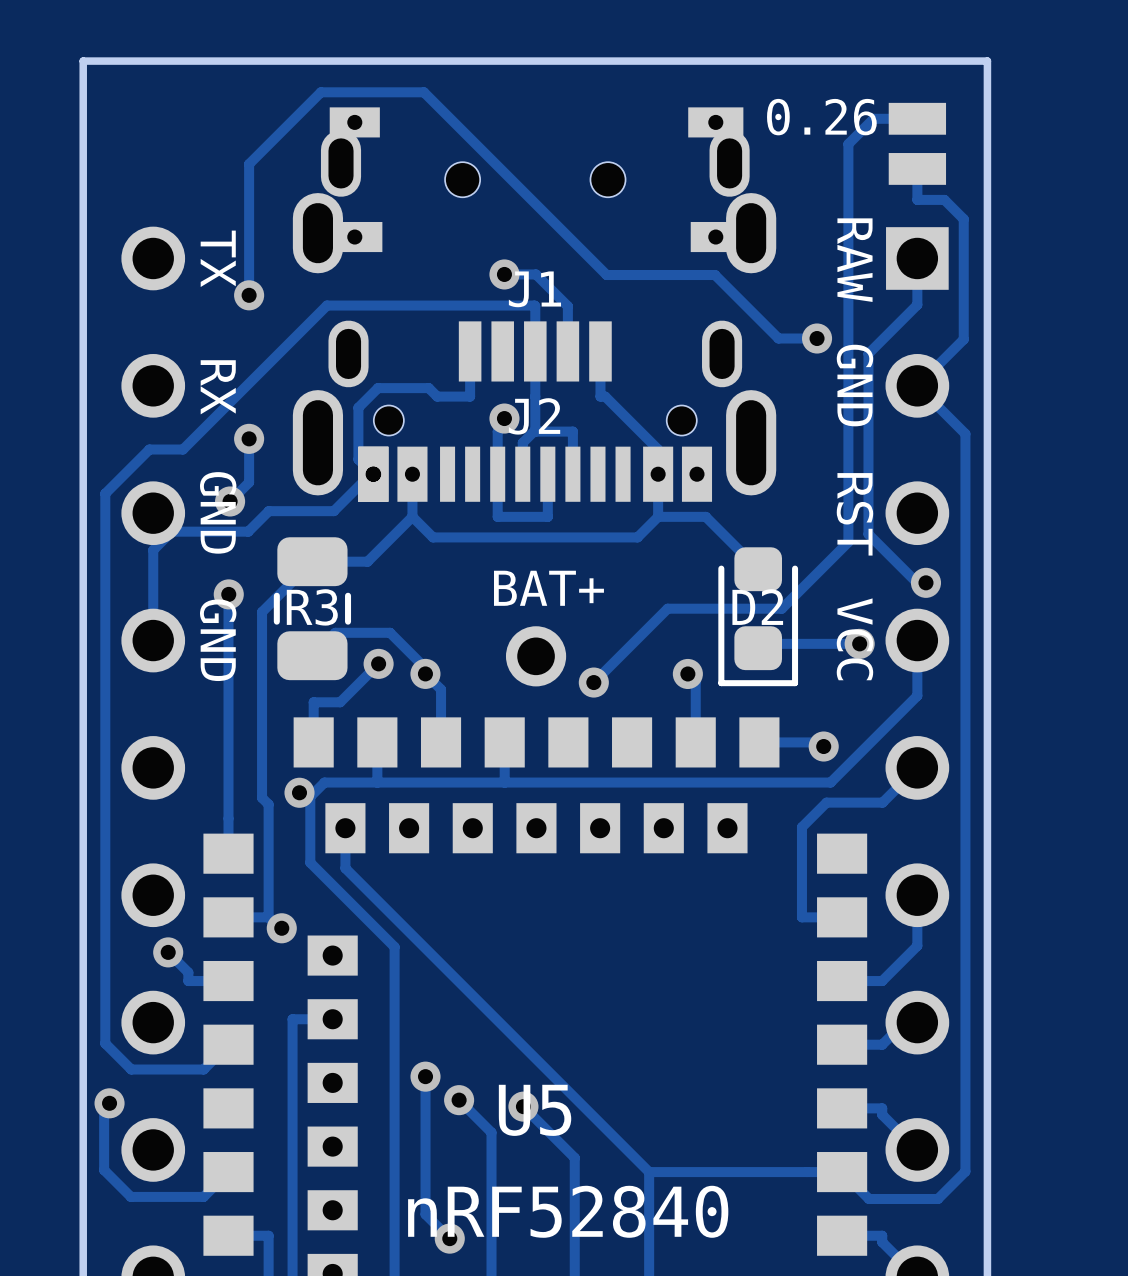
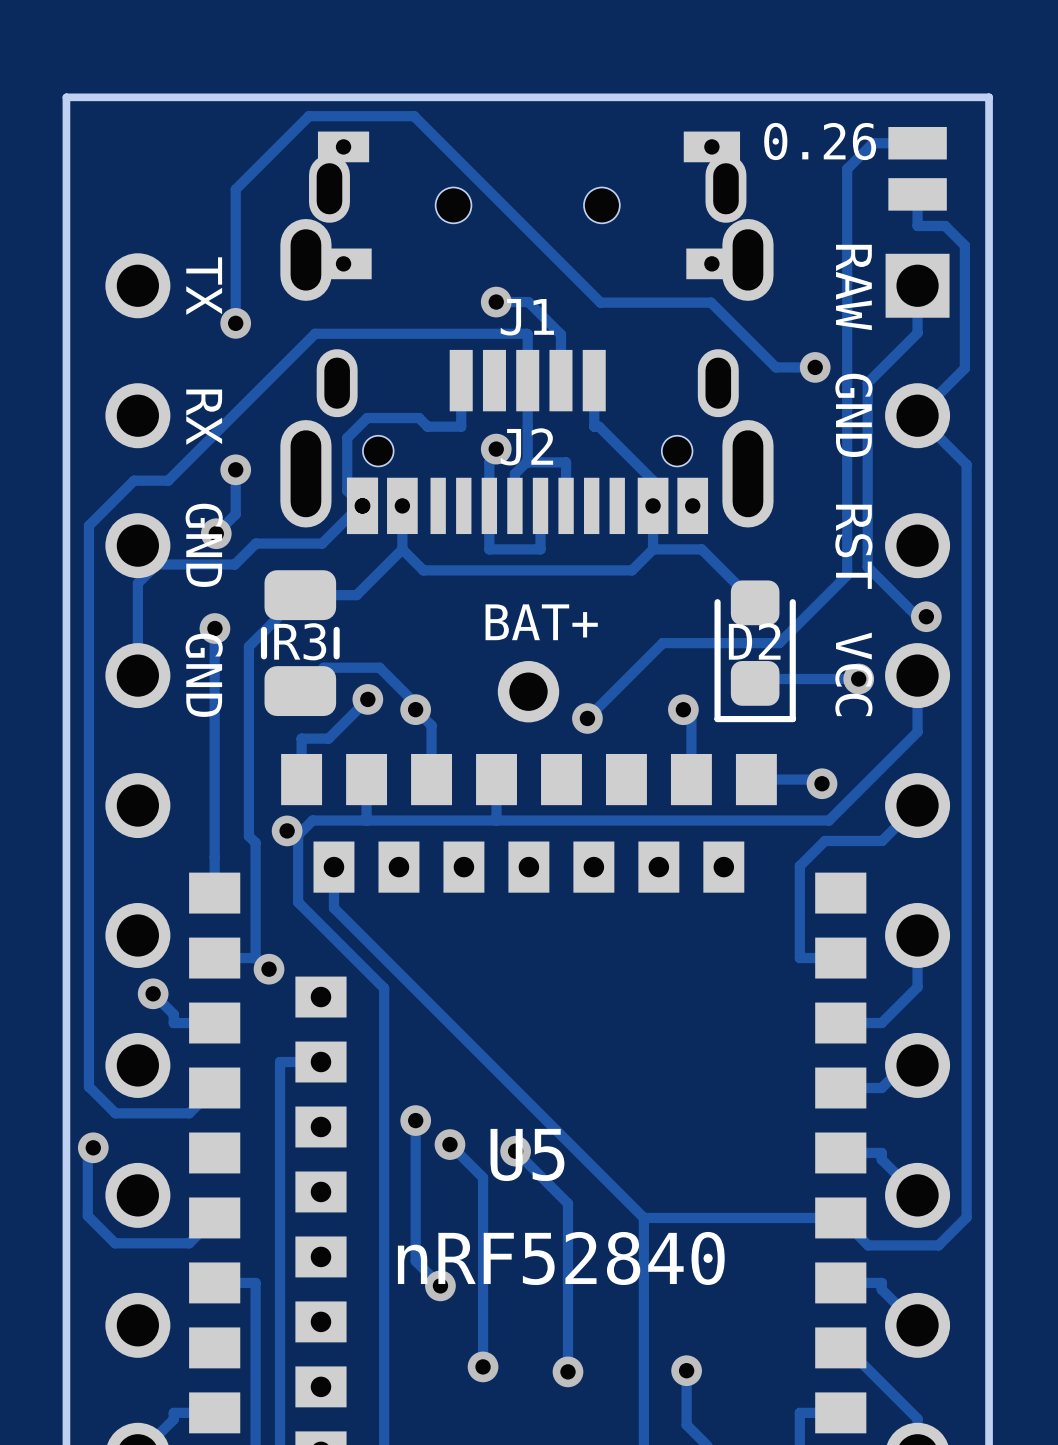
board edge: (987, 73) (987, 61) (83, 61) (83, 73) -> (989, 97) (66, 97)

